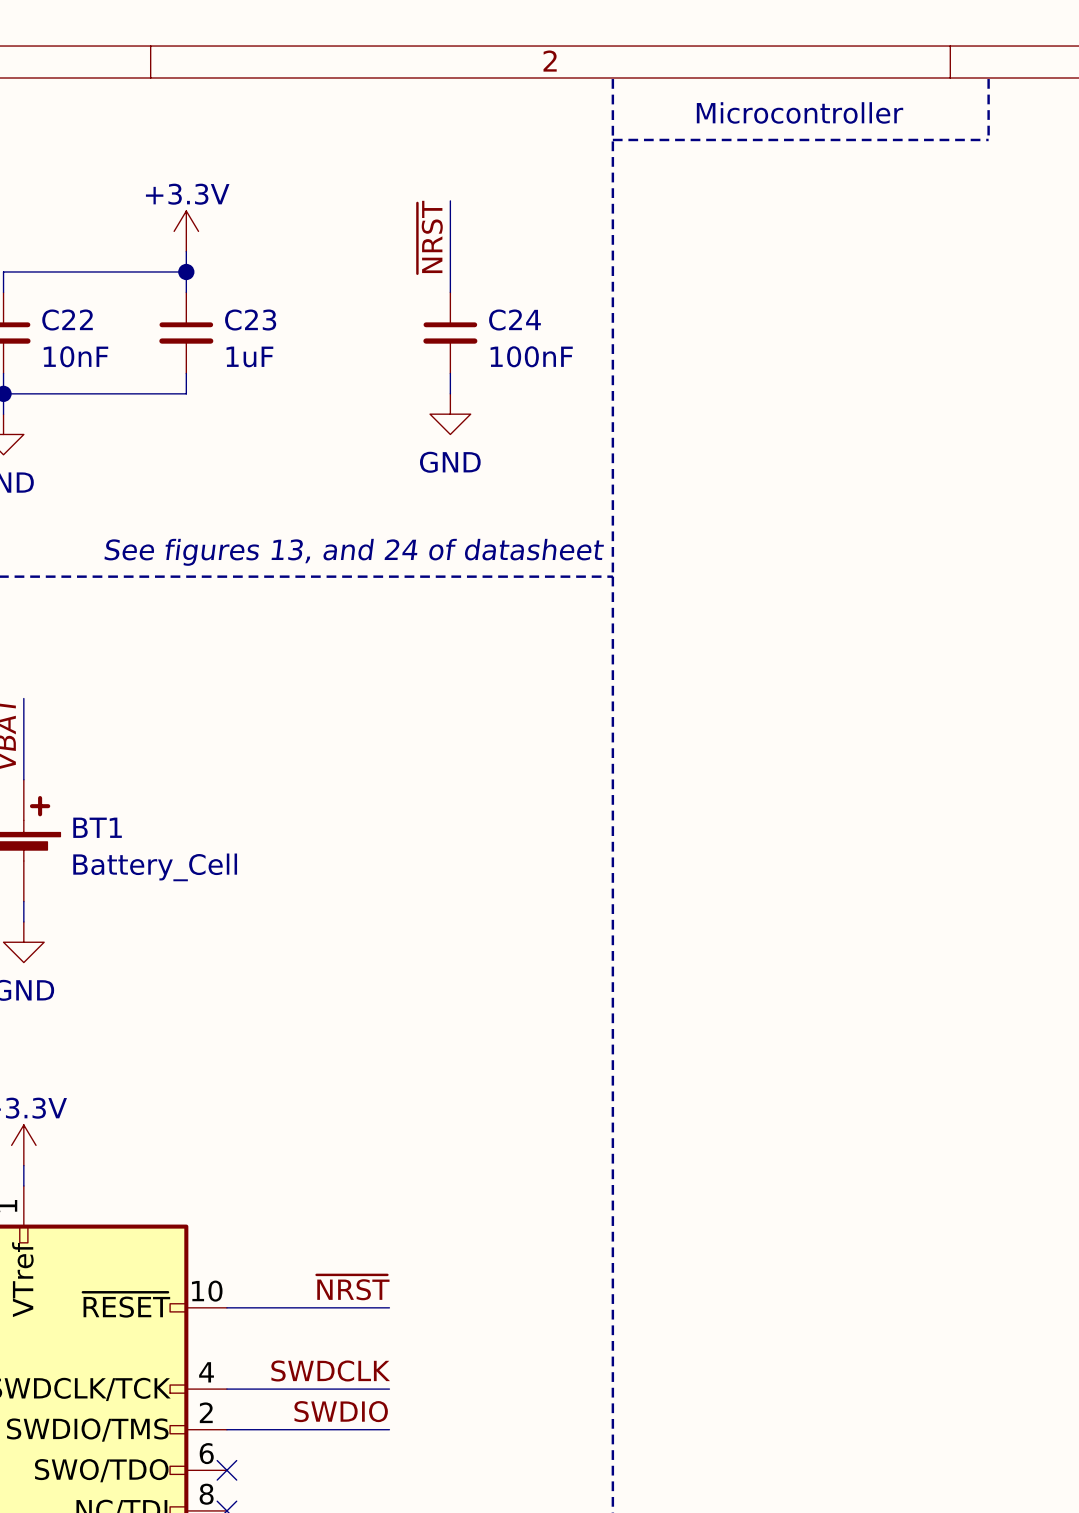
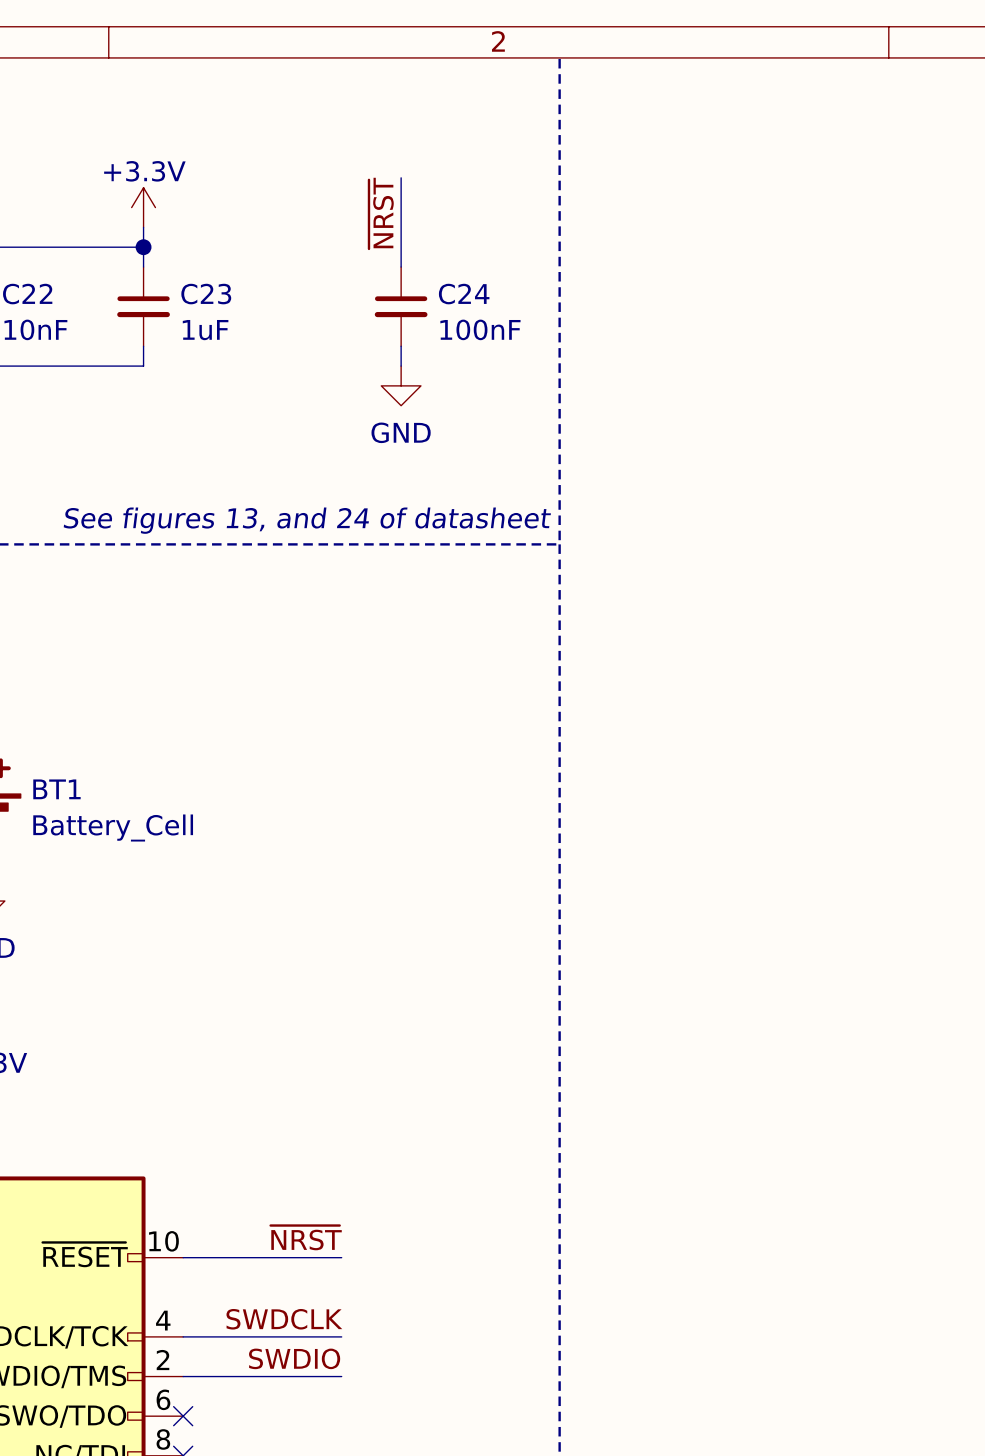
line: (988, 79) (988, 139) (612, 139) -> none
text: Microcontroller (800, 112) -> none

